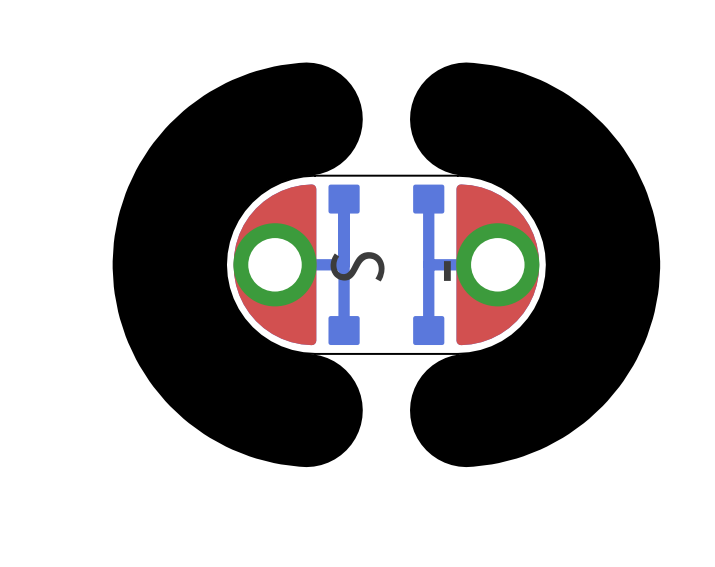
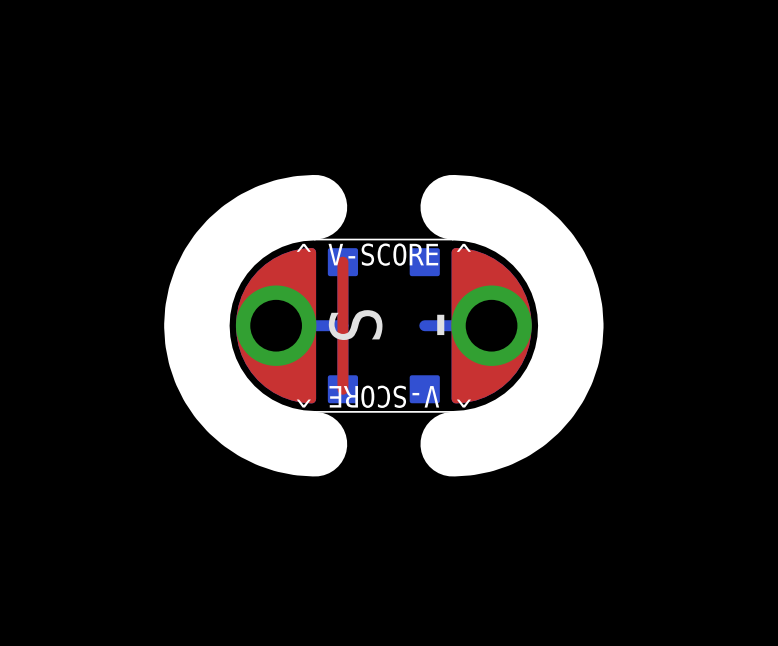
board edge: (306, 119) (287, 121) (253, 132) (237, 141) (208, 164) (187, 194) (179, 211) (170, 246) (169, 264) (170, 283) (179, 318) (187, 335) (208, 364) (237, 388) (253, 396) (287, 408) (306, 410) -> none
board edge: (466, 119) (484, 121) (519, 132) (535, 141) (564, 164) (585, 194) (593, 211) (602, 246) (603, 264) (602, 283) (593, 318) (585, 335) (564, 364) (535, 388) (519, 396) (484, 408) (466, 410) -> none
board edge: none -> (314, 207) (299, 208) (269, 216) (255, 223) (231, 241) (212, 266) (205, 280) (197, 310) (196, 325) (197, 341) (205, 371) (212, 384) (231, 409) (255, 428) (269, 435) (299, 443) (314, 444)
board edge: none -> (452, 207) (468, 208) (498, 216) (512, 223) (536, 241) (555, 266) (562, 280) (570, 310) (571, 325) (570, 341) (562, 371) (555, 384) (536, 409) (512, 428) (498, 435) (468, 443) (452, 444)
text: none -> ^ V-SCORE ^ (383, 254)
top track: none -> (342, 262) (342, 389)
bottom track: (428, 199) (428, 330) -> none
text: none -> ^ V-SCORE ^ (383, 396)

